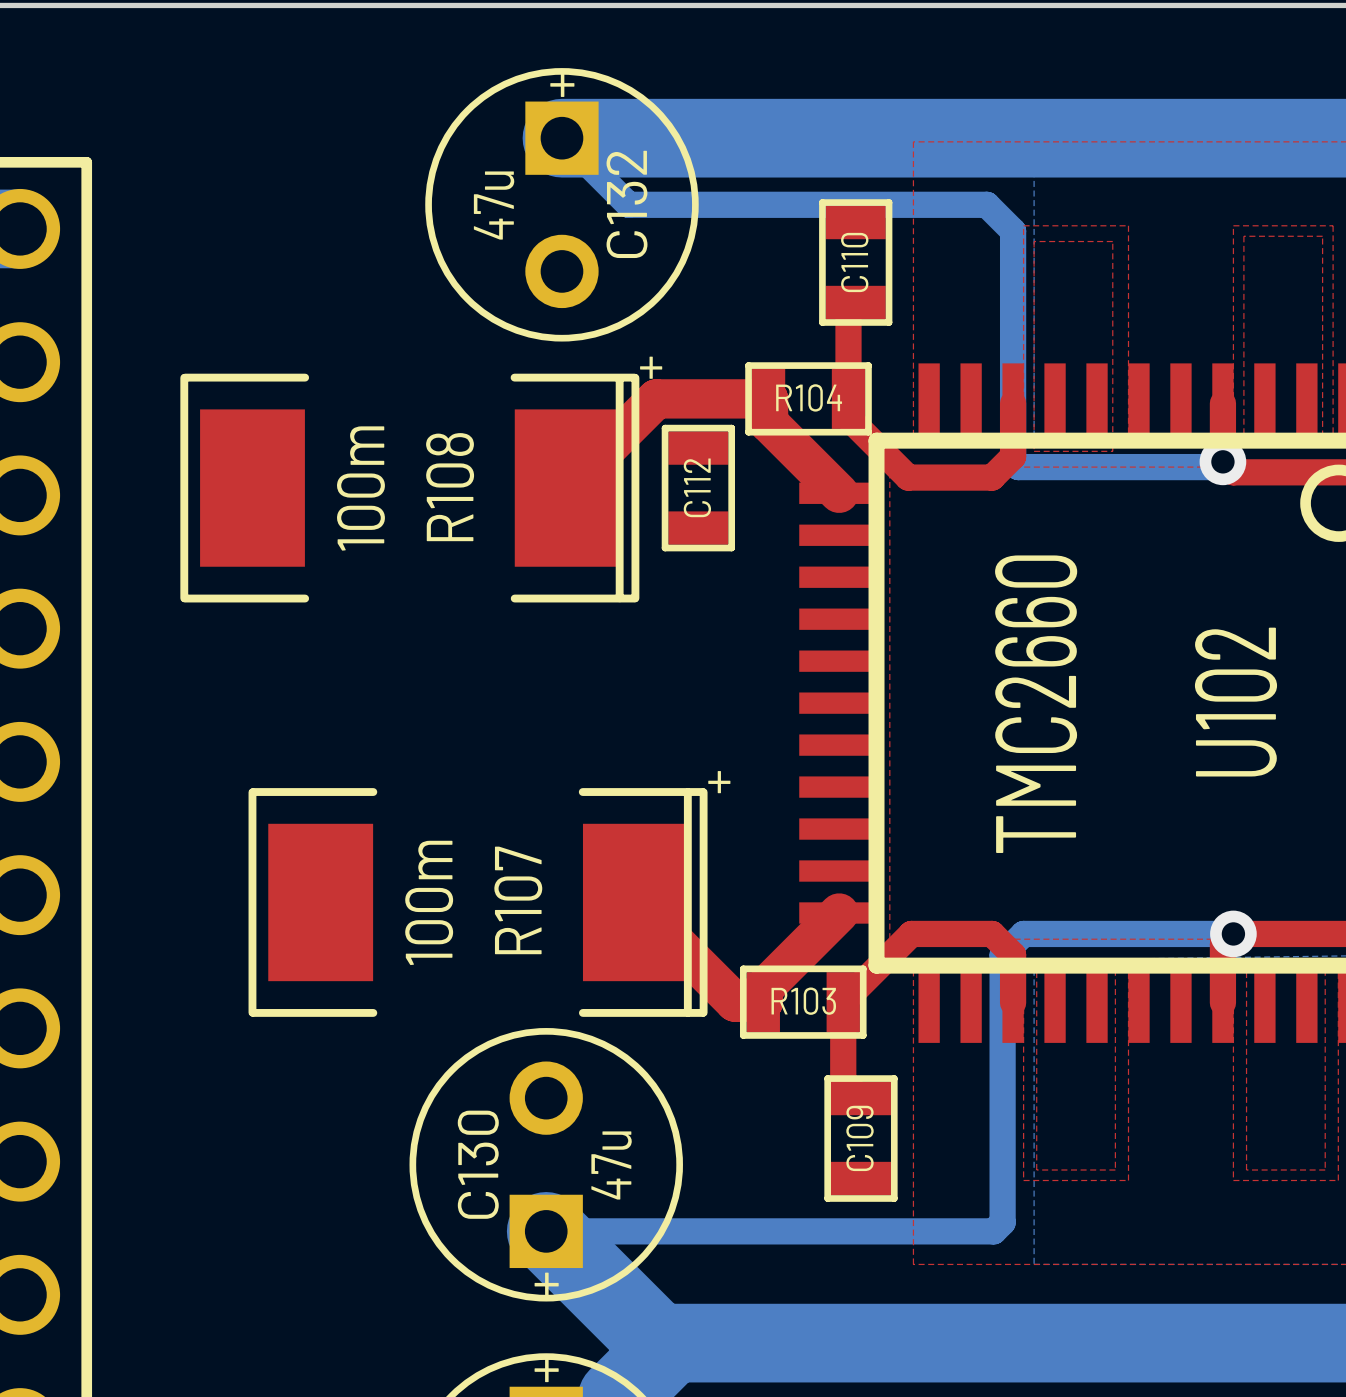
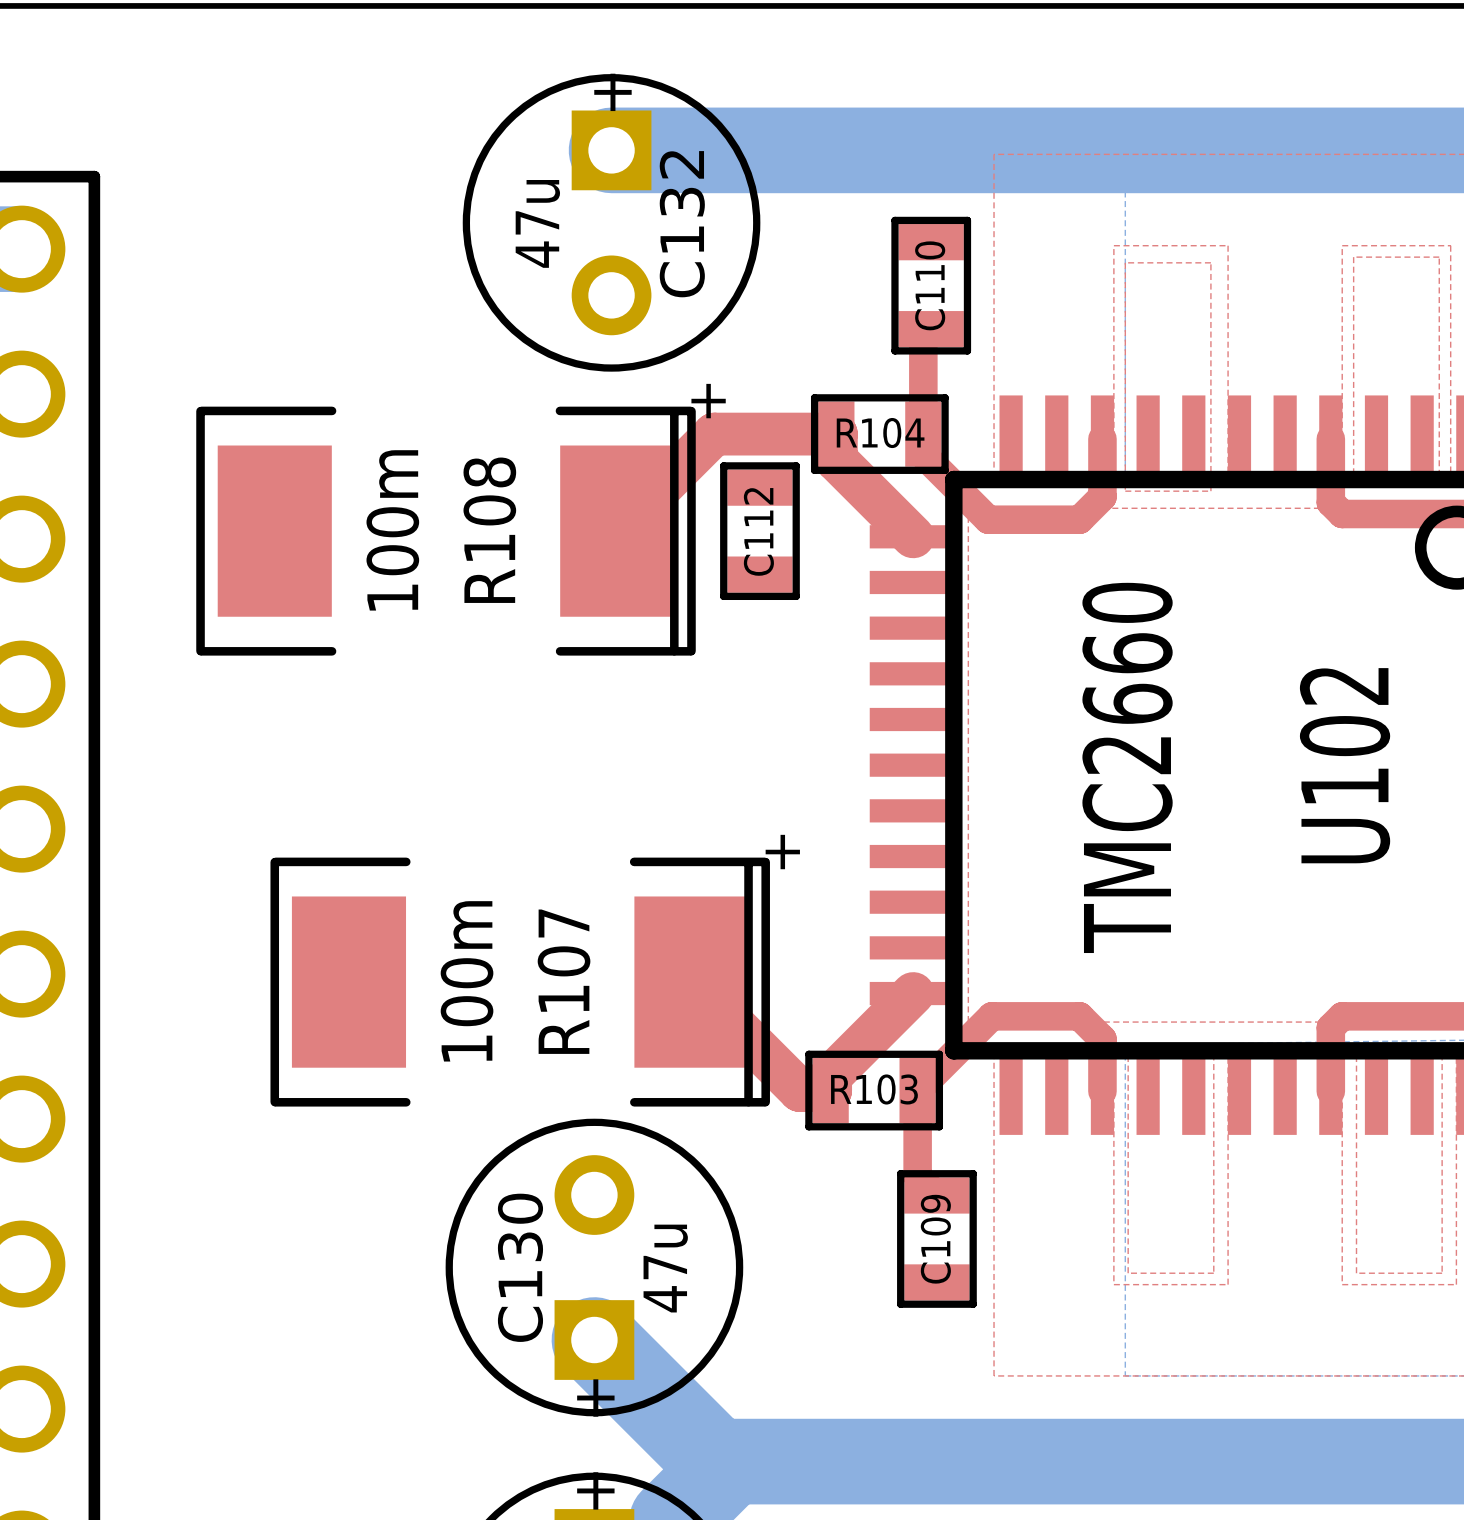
bottom track: (561, 138) (628, 204) (986, 204) (1013, 231) (1013, 461) (1018, 467) (1217, 467) (1222, 461) -> none
via: (1222, 461) -> none
bottom track: (1233, 933) (1023, 933) (1002, 954) (1002, 1222) (993, 1231) (546, 1231) -> none
via: (1233, 933) -> none

